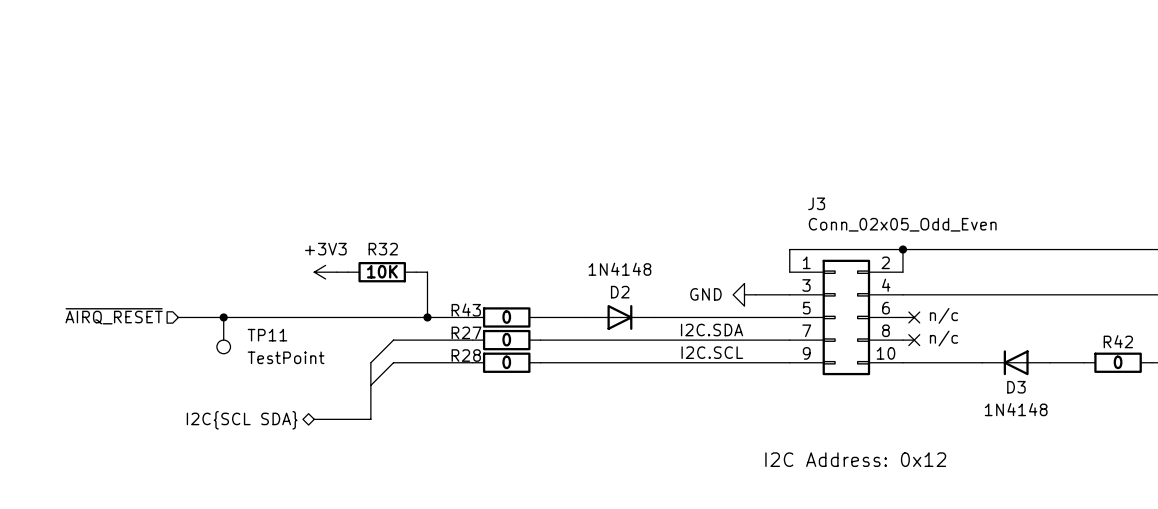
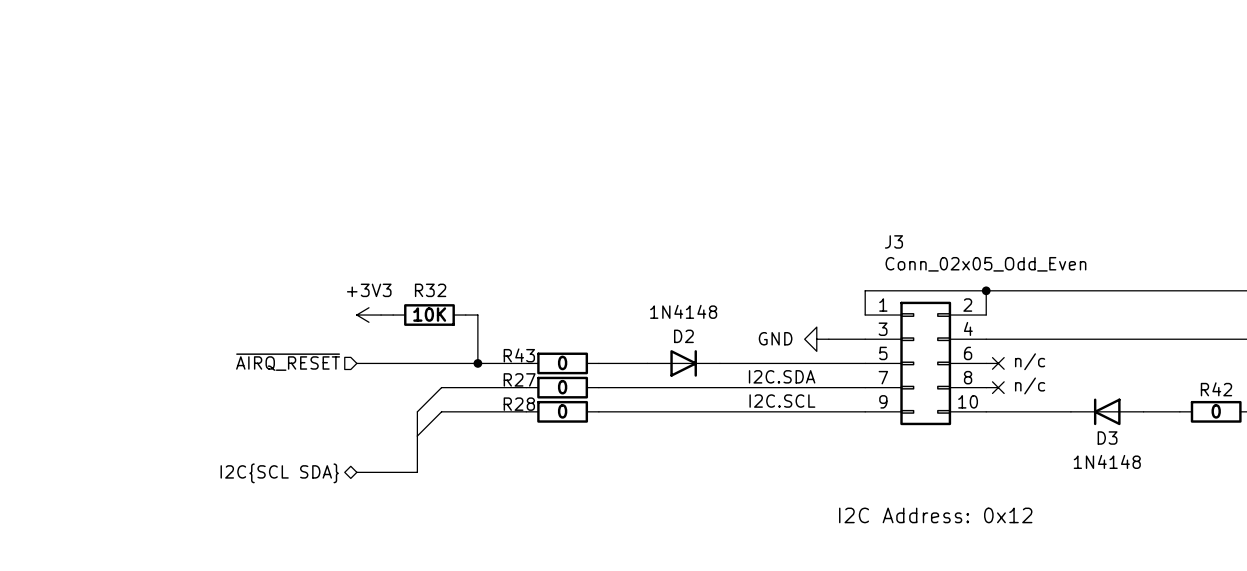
hierarchical label position: ~{AIRQ_RESET} (114, 316) -> ~{AIRQ_RESET} (288, 362)
wire: (178, 317) (314, 317) -> none
junction: (223, 317) -> none
TP11: TestPoint (223, 335) -> none

